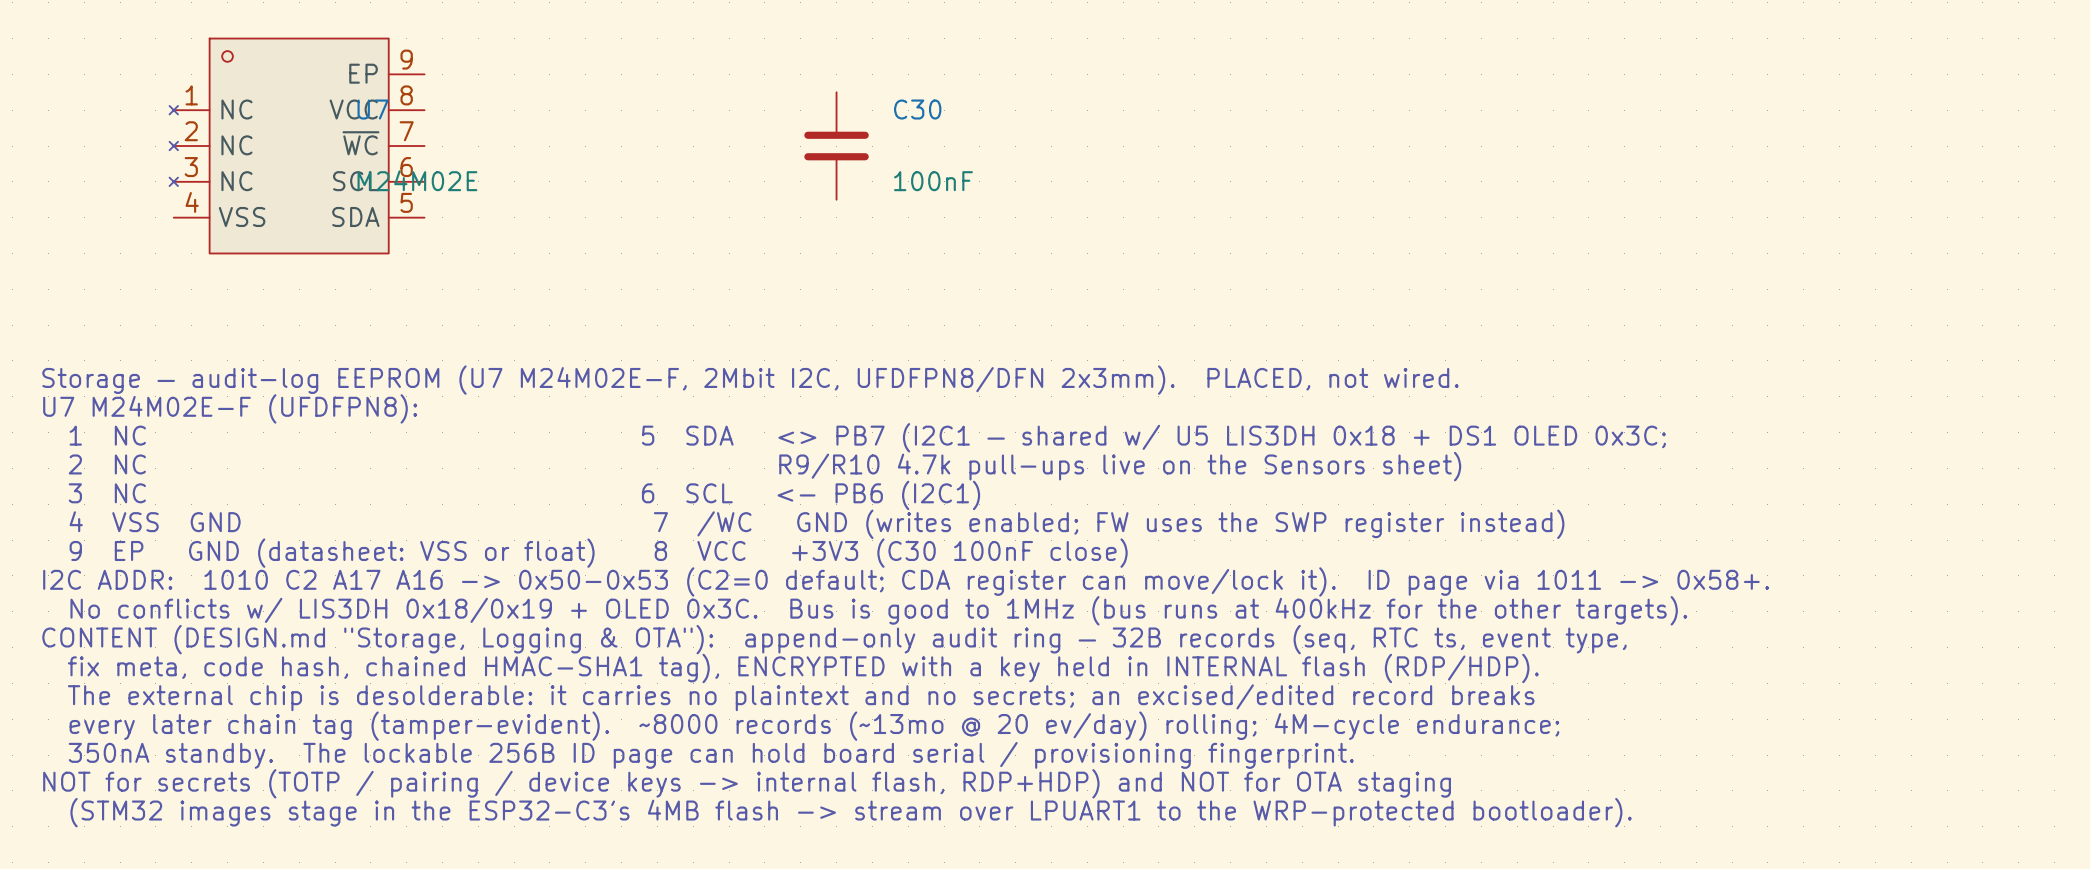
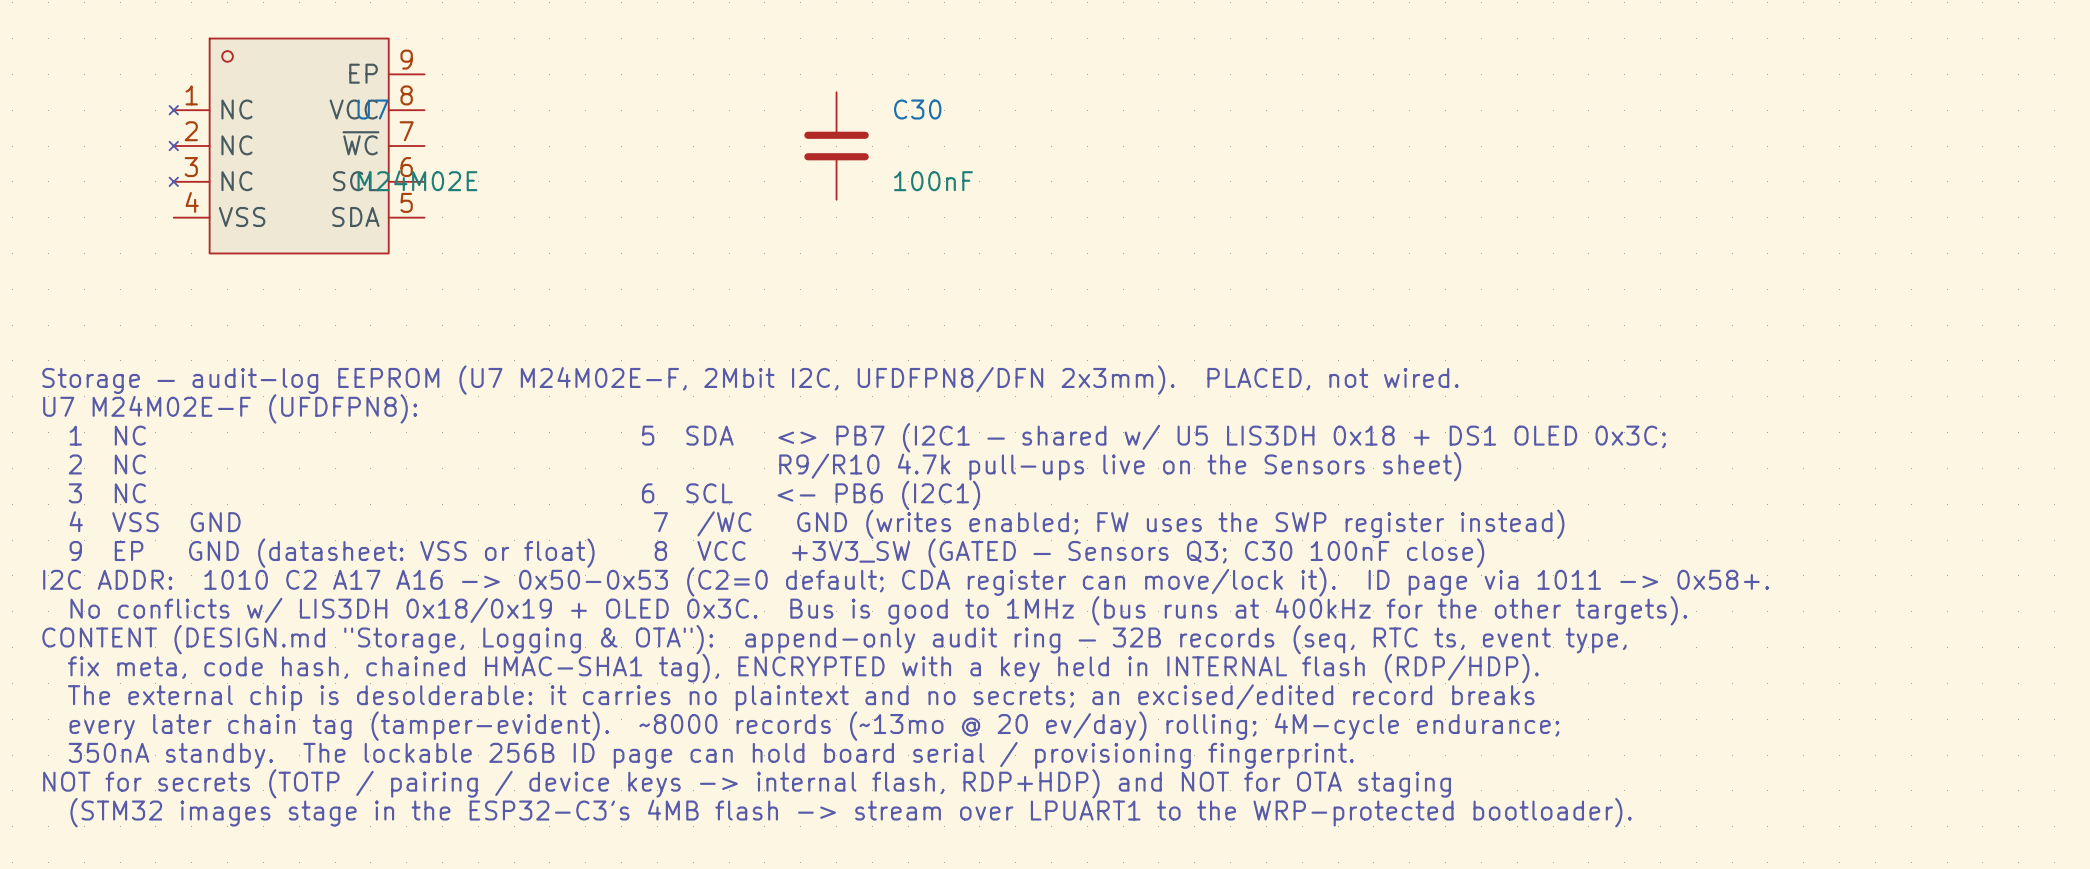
text: 9 EP GND (datasheet: VSS or float) 8 VCC +3V3 (C30 100nF close) (598, 553) -> 9 EP GND (datasheet: VSS or float) 8 VCC +3V3_SW (GATED — Sensors Q3; C30 100nF close) (776, 553)

